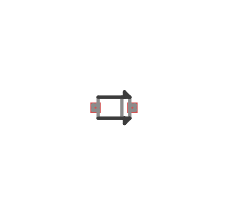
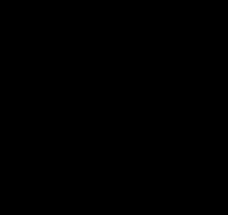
part: (113, 107) -> none

